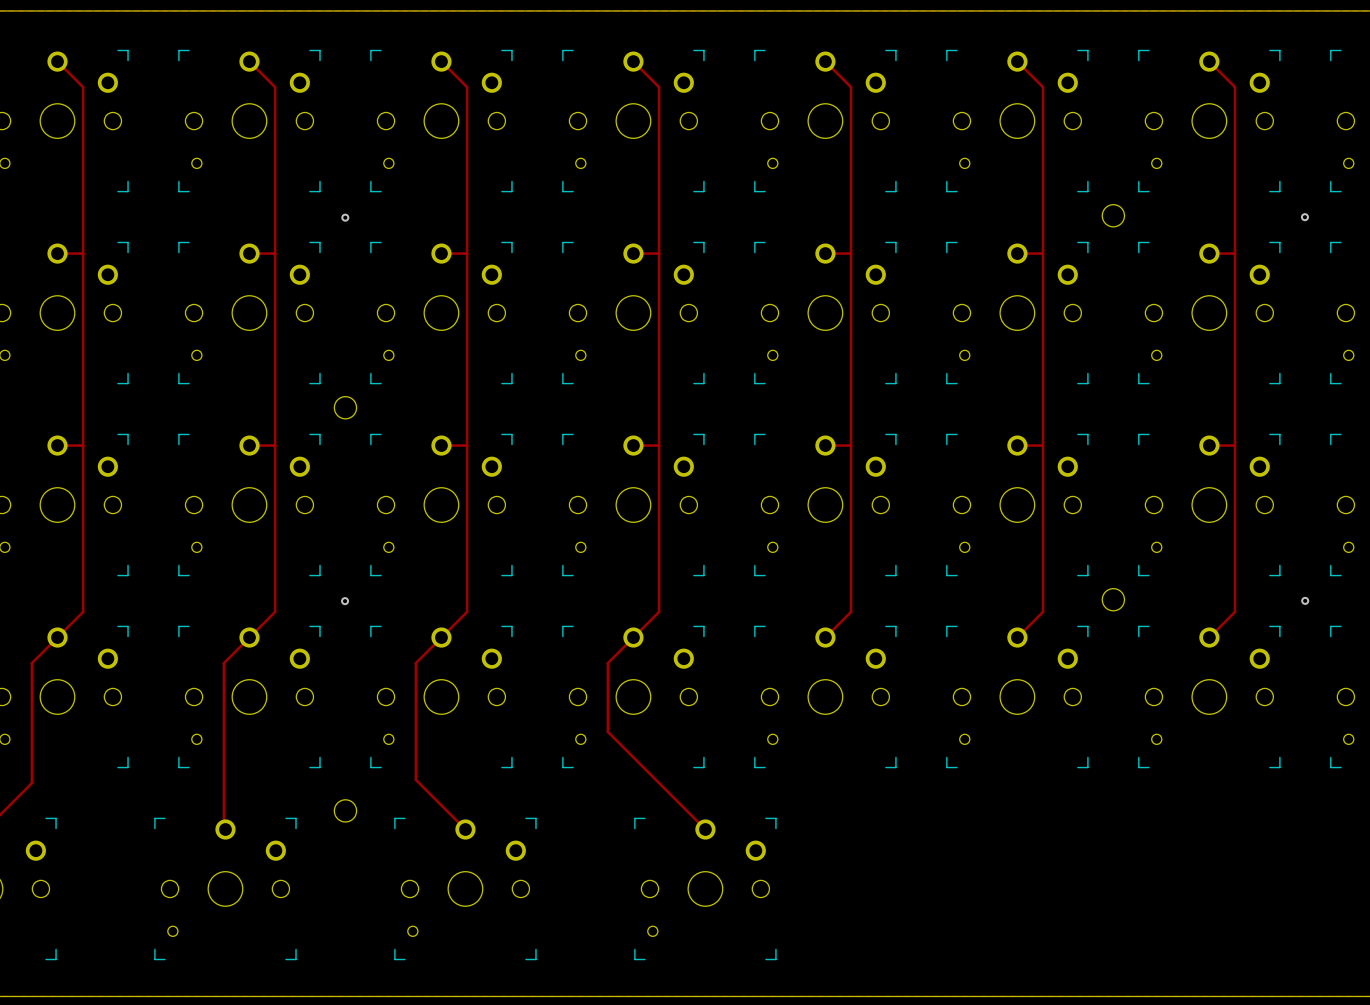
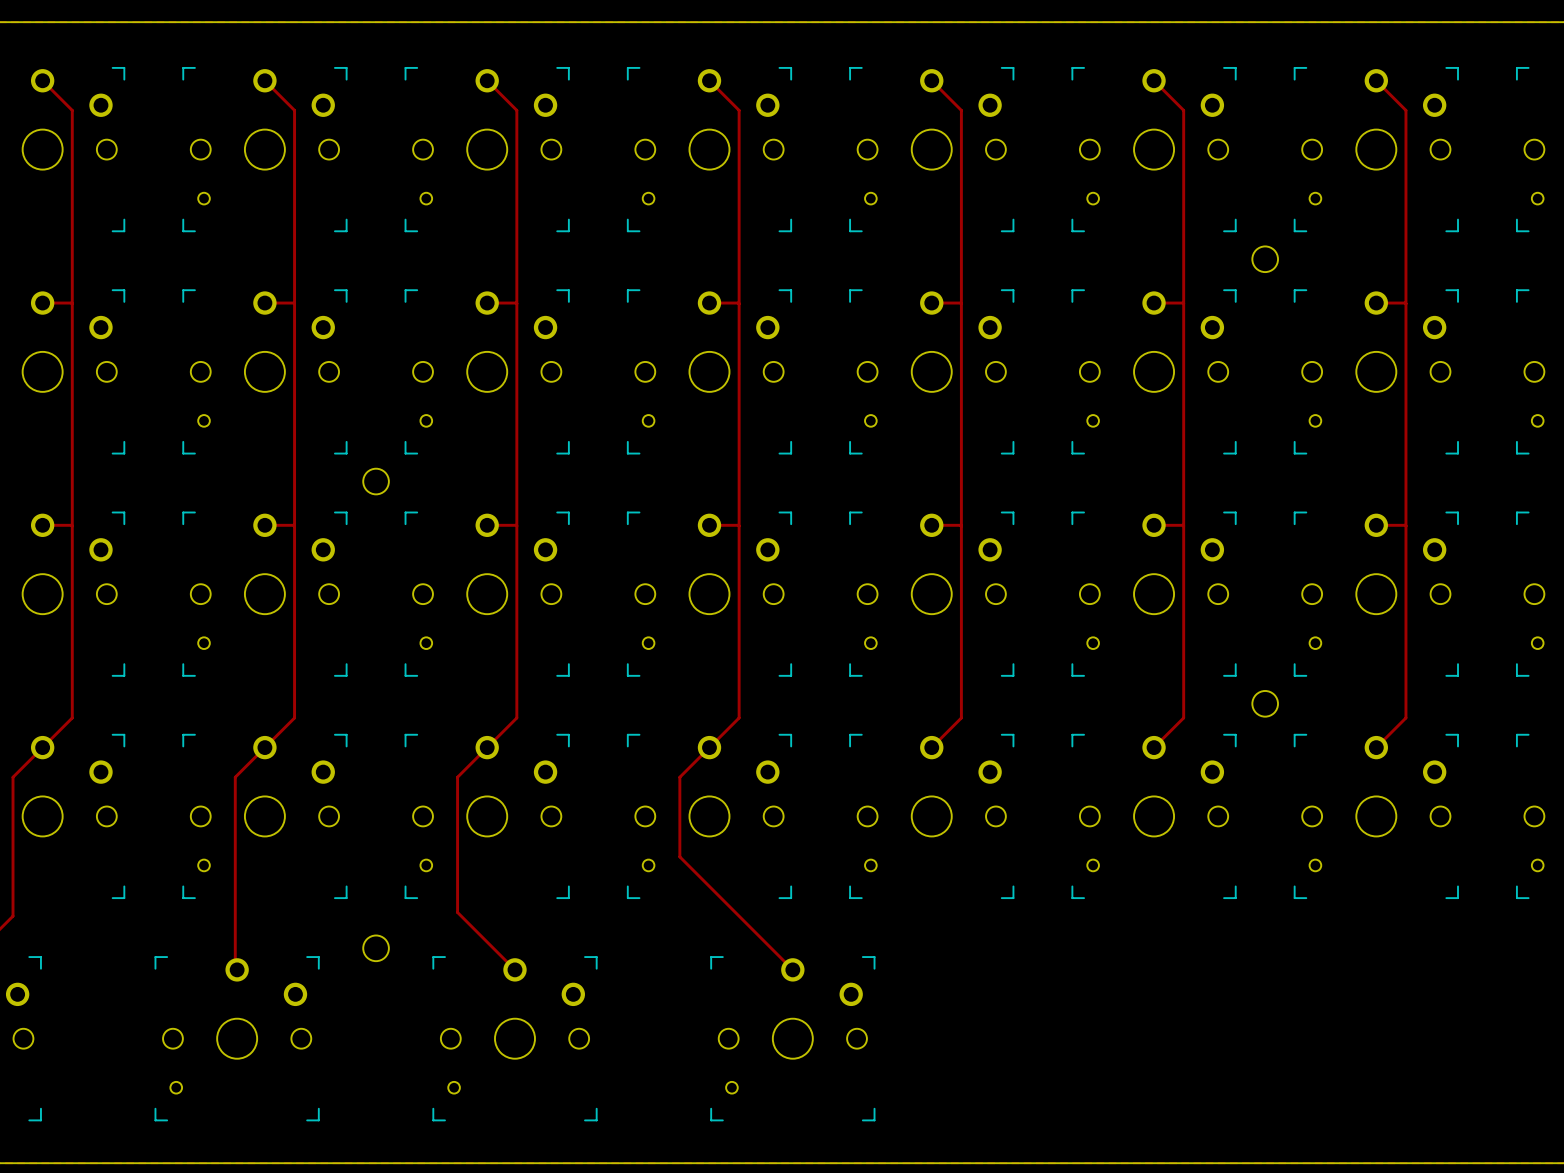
via: (345, 217) -> none
via: (1304, 217) -> none
via: (1305, 600) -> none
via: (345, 601) -> none

